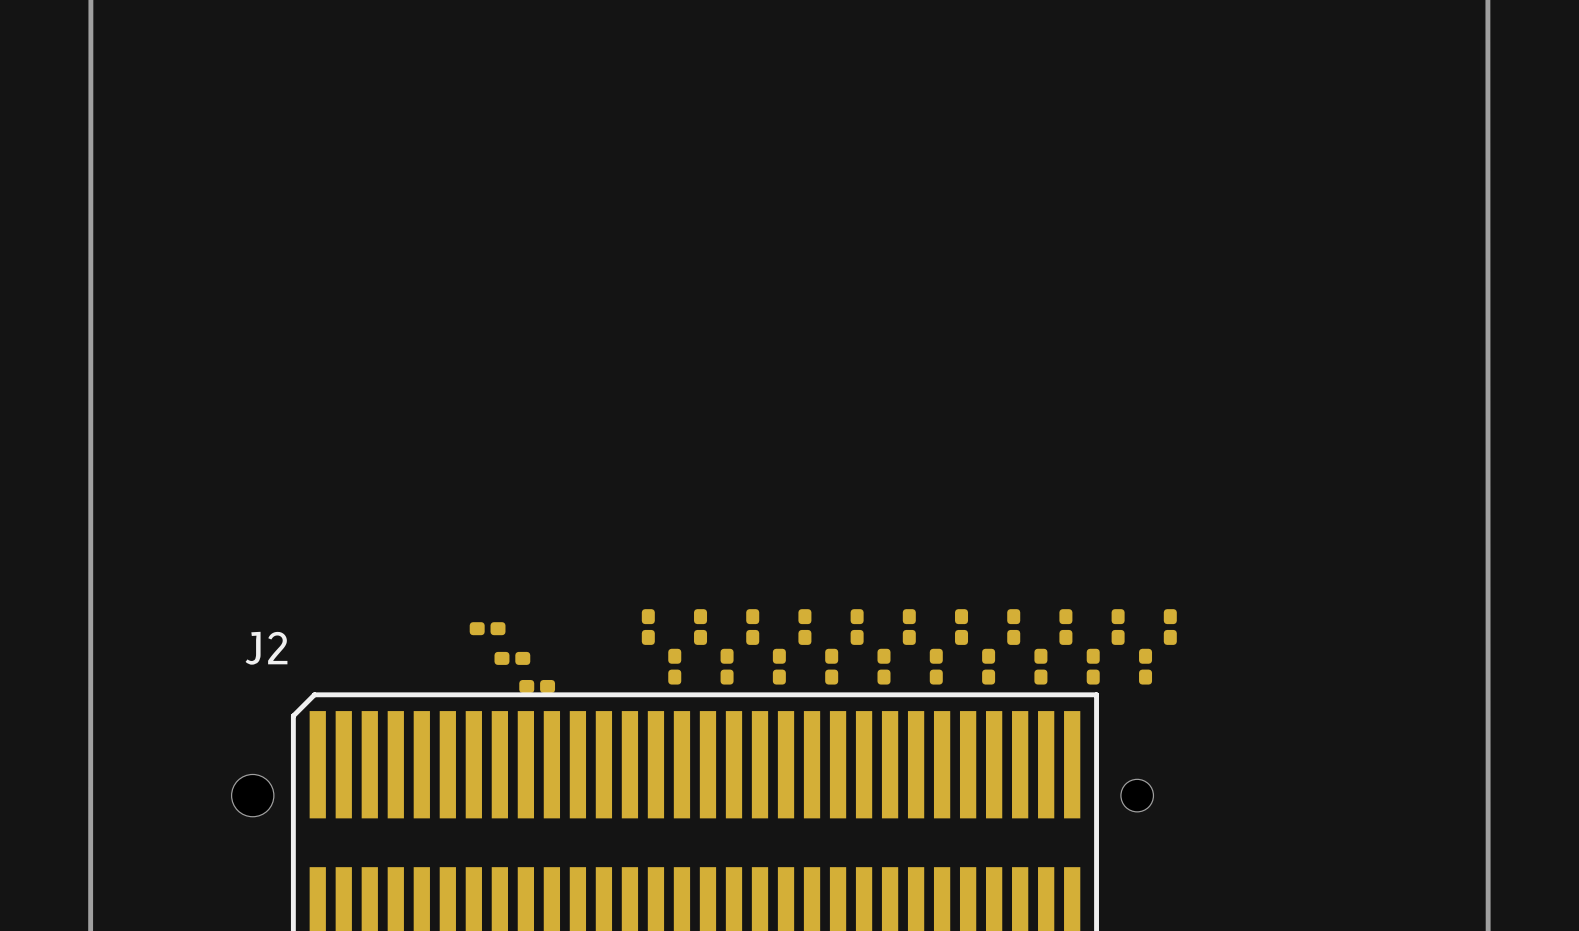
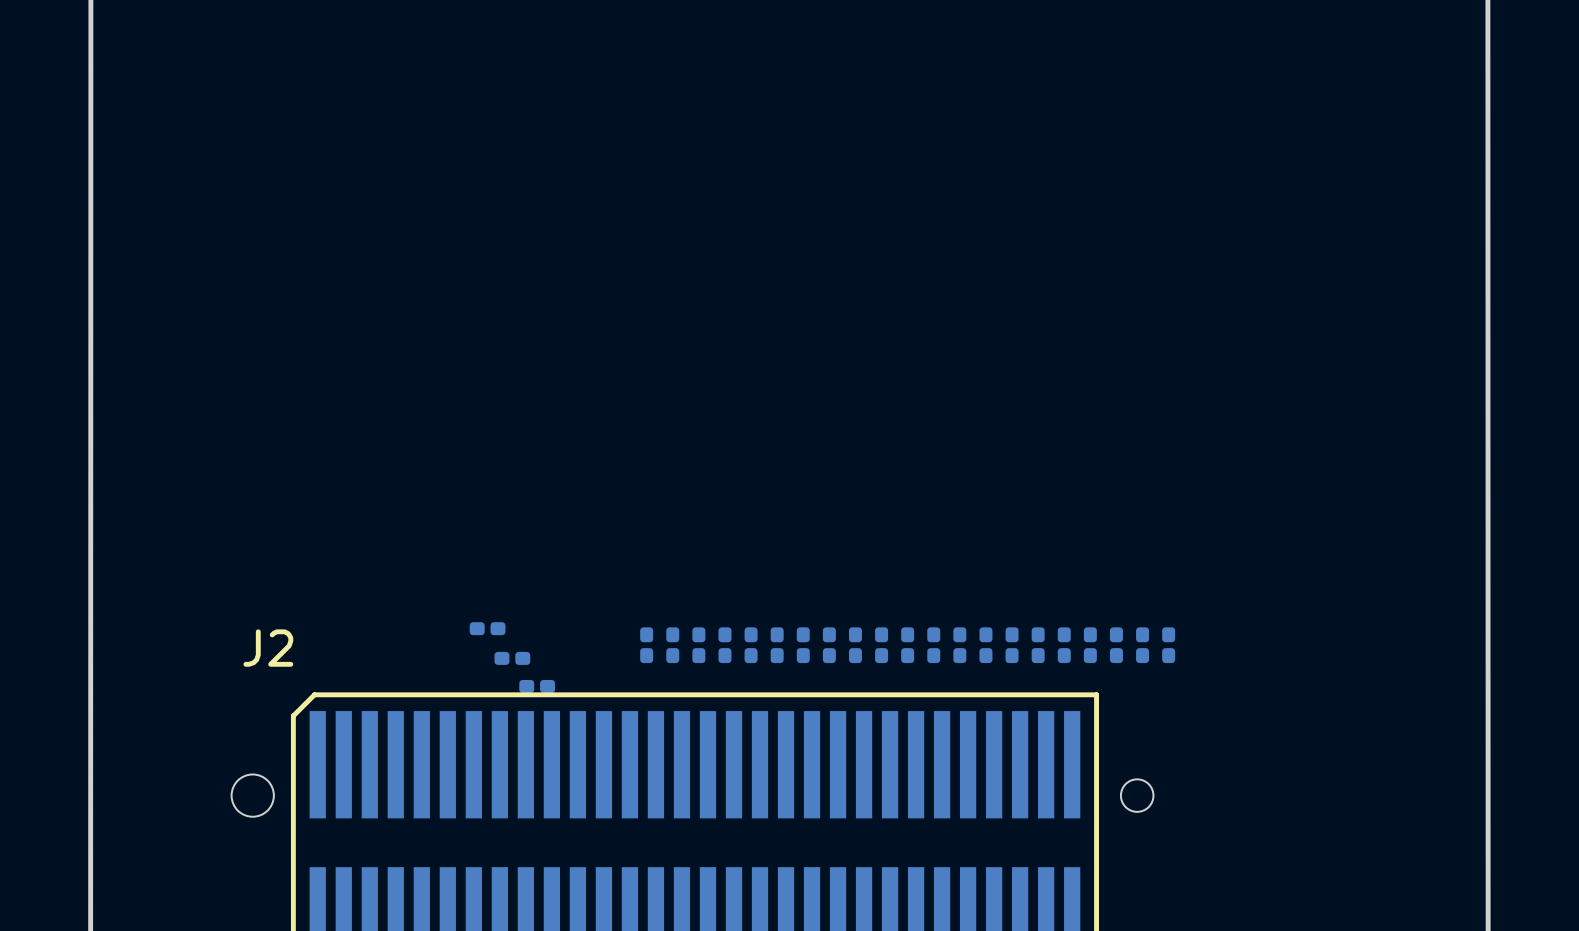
part: (648, 627) -> none
part: (700, 627) -> none
part: (752, 627) -> none
part: (804, 627) -> none
part: (857, 627) -> none
part: (909, 627) -> none
part: (961, 627) -> none
part: (1013, 627) -> none
part: (1065, 627) -> none
part: (1118, 627) -> none
part: (1170, 627) -> none
part: none -> (646, 645)
part: none -> (672, 645)
part: none -> (698, 645)
part: none -> (724, 645)
part: none -> (751, 645)
part: none -> (777, 645)
part: none -> (803, 645)
part: none -> (829, 645)
part: none -> (855, 645)
part: none -> (881, 645)
part: none -> (907, 645)
part: none -> (933, 645)
part: none -> (959, 645)
part: none -> (985, 645)
part: none -> (1012, 645)
part: none -> (1038, 645)
part: none -> (1064, 645)
part: none -> (1090, 645)
part: none -> (1116, 645)
part: none -> (1142, 645)
part: none -> (1168, 645)
part: (674, 666) -> none
part: (727, 666) -> none
part: (779, 666) -> none
part: (831, 666) -> none
part: (883, 666) -> none
part: (936, 666) -> none
part: (988, 666) -> none
part: (1040, 666) -> none
part: (1093, 666) -> none
part: (1145, 666) -> none

